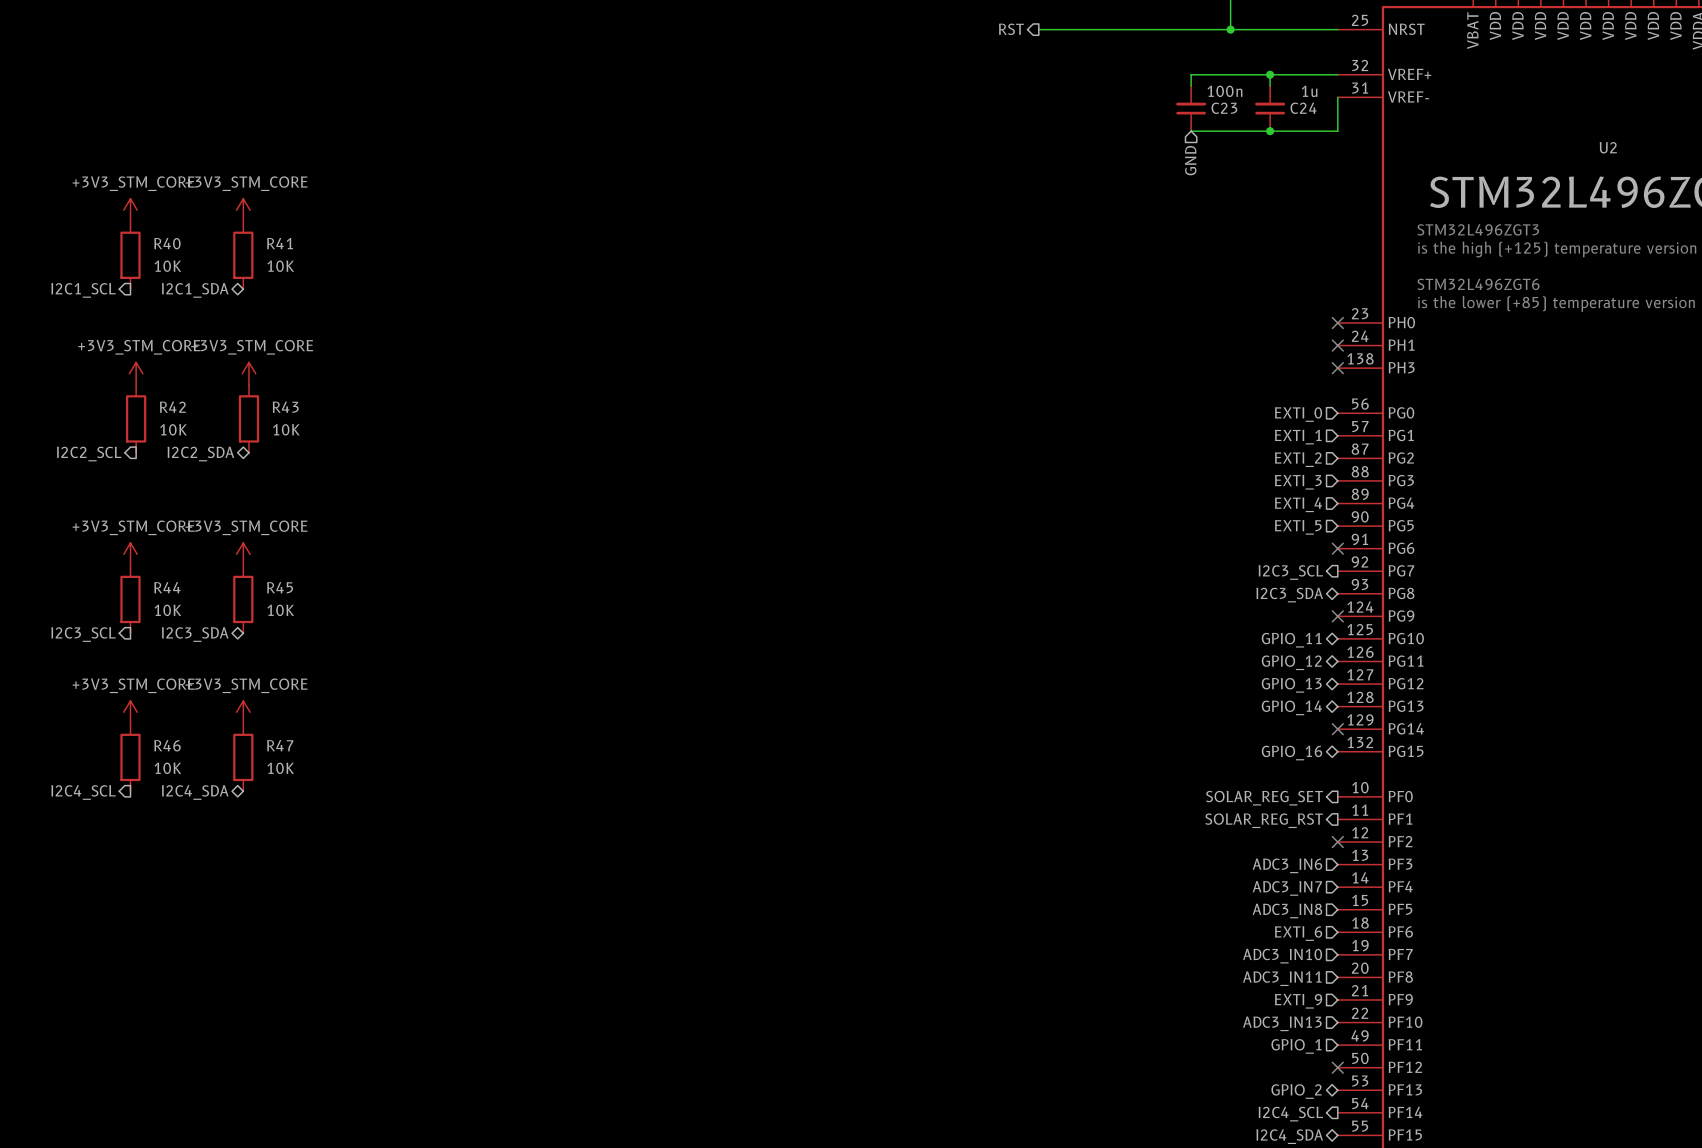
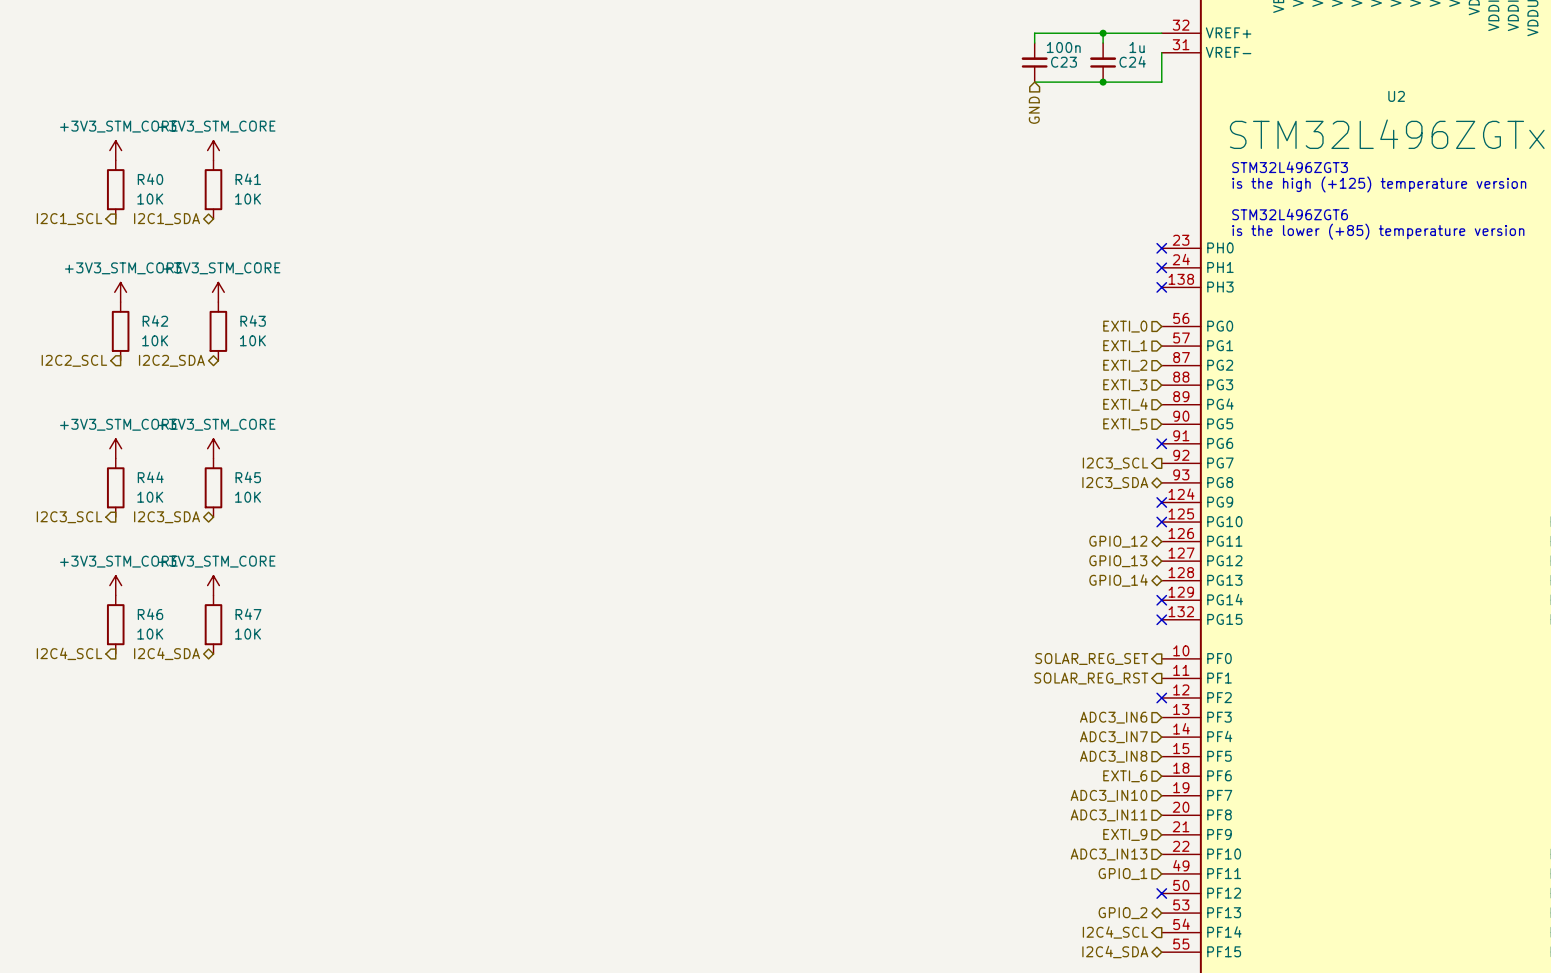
no-connect mark: none -> (1161, 522)
hierarchical label: GPIO_11 (1291, 640) -> none
no-connect mark: none -> (1161, 619)
hierarchical label: GPIO_16 (1291, 753) -> none

